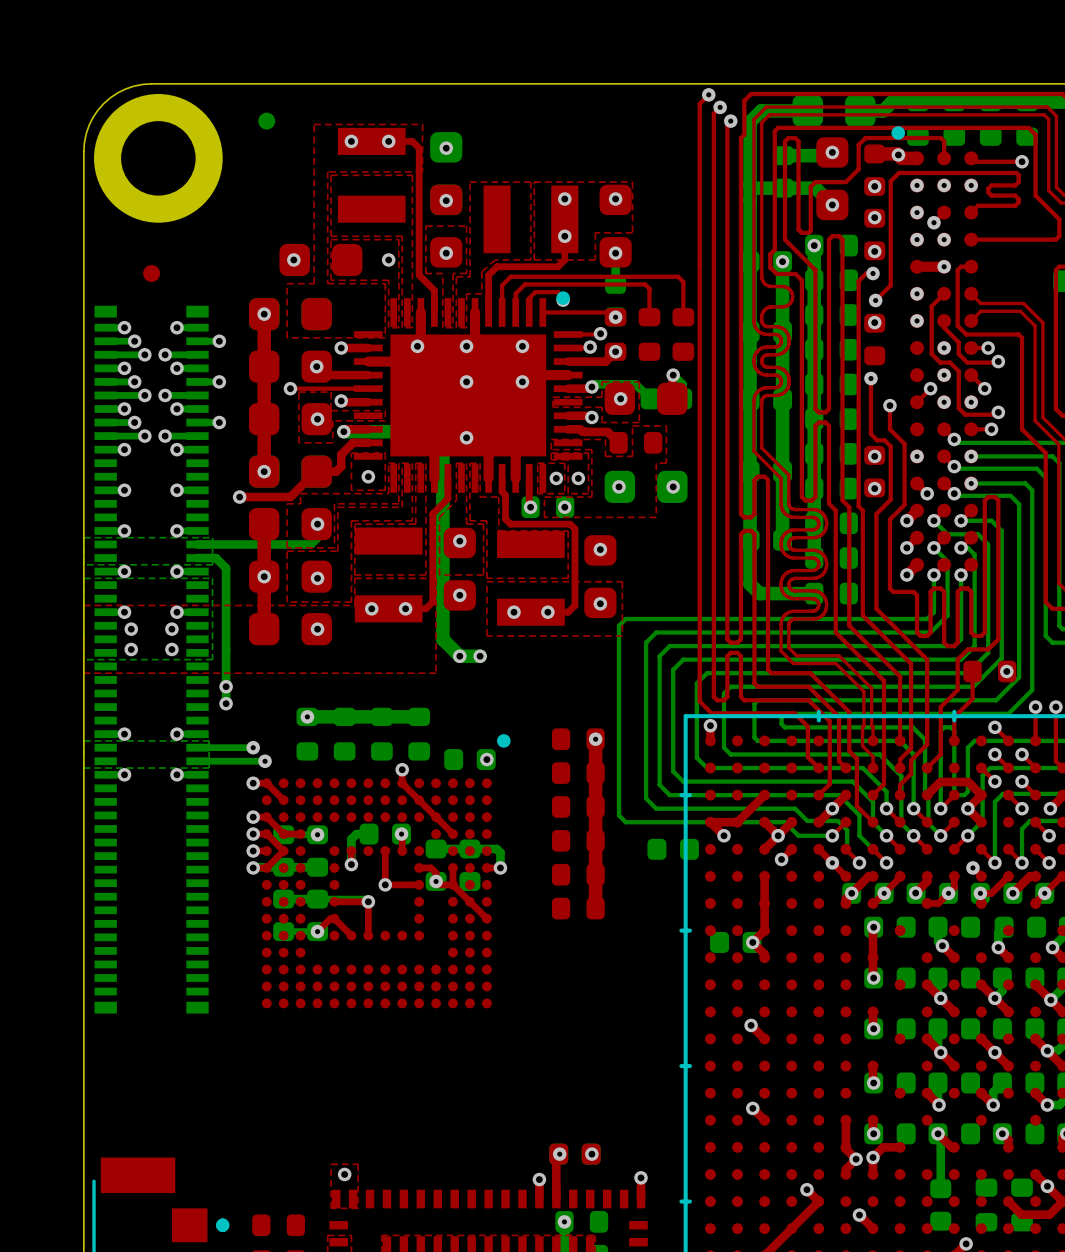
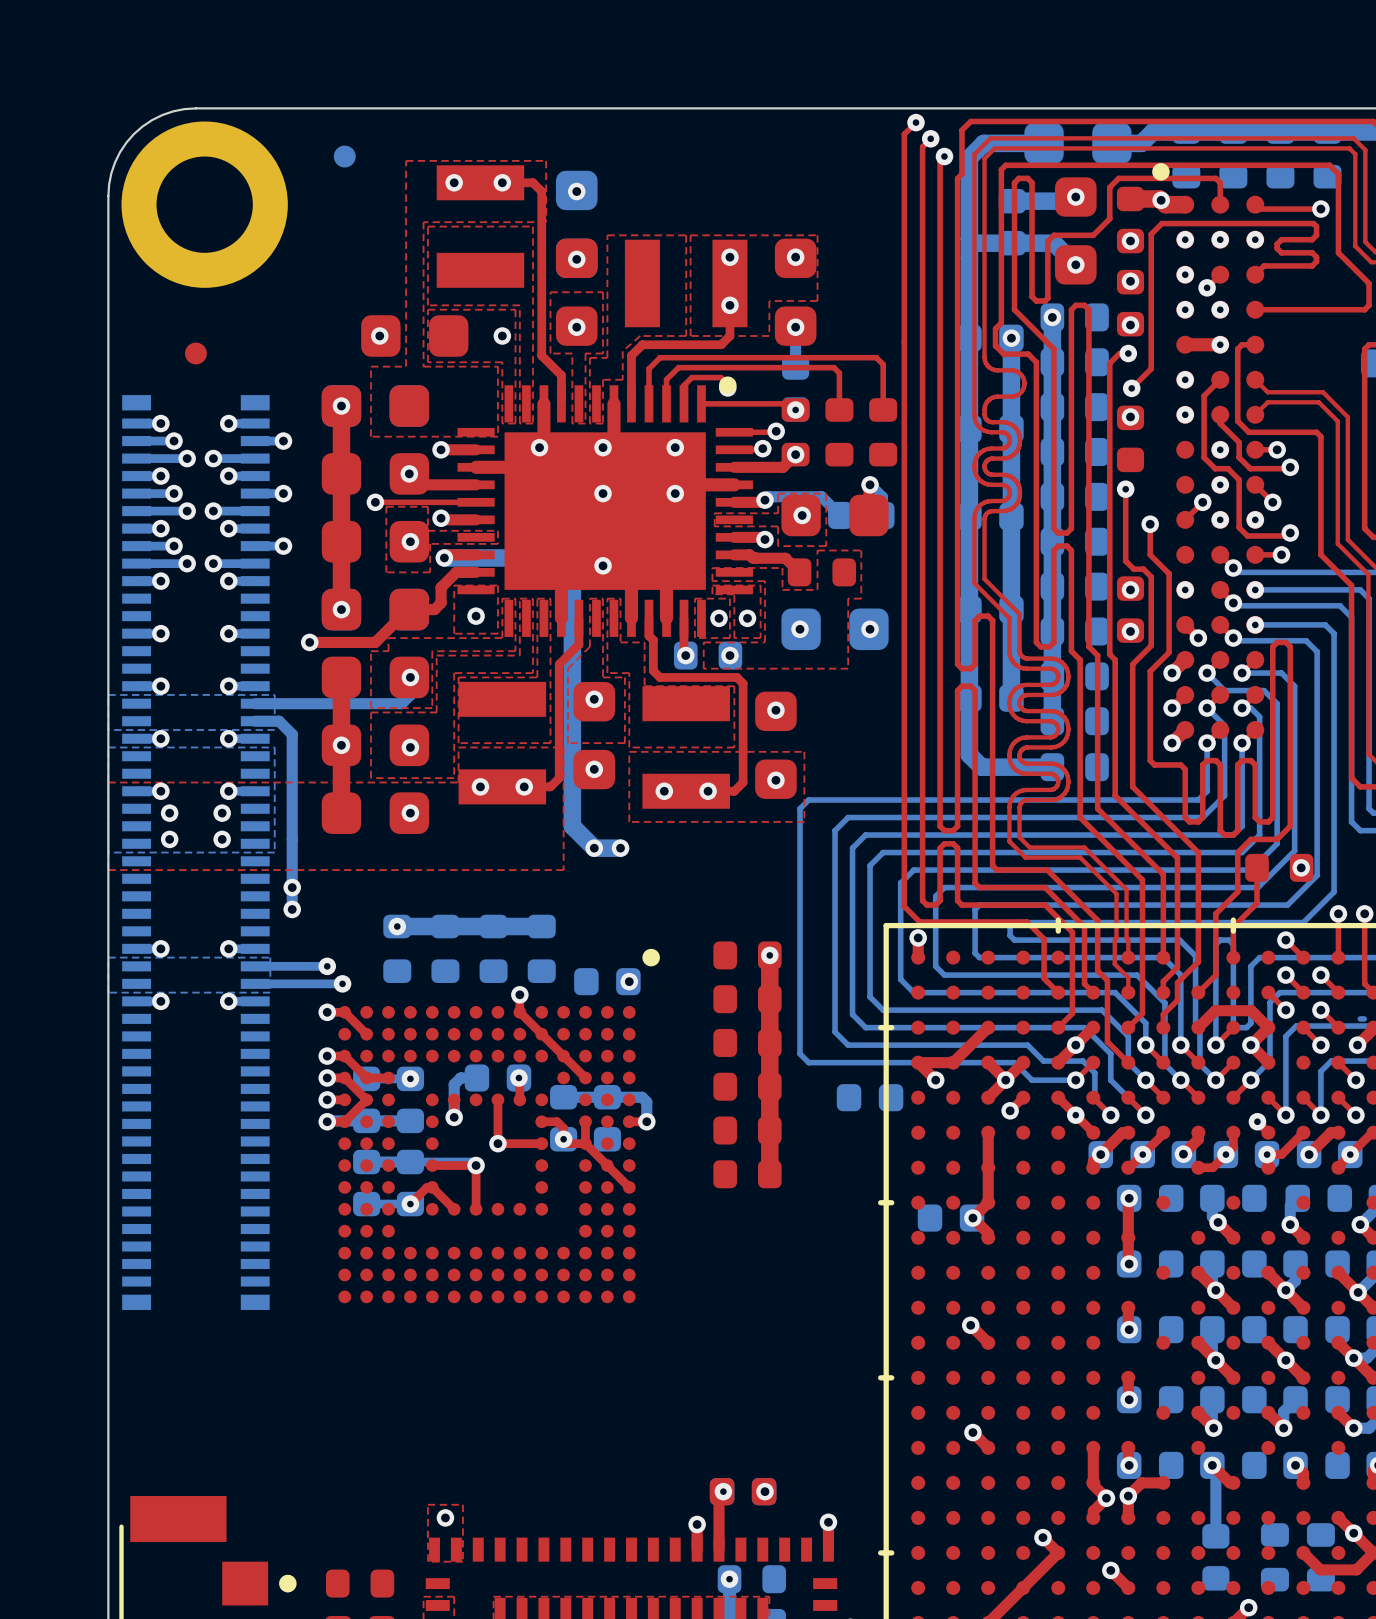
bottom track: none -> (1360, 1018) (1364, 1018)

